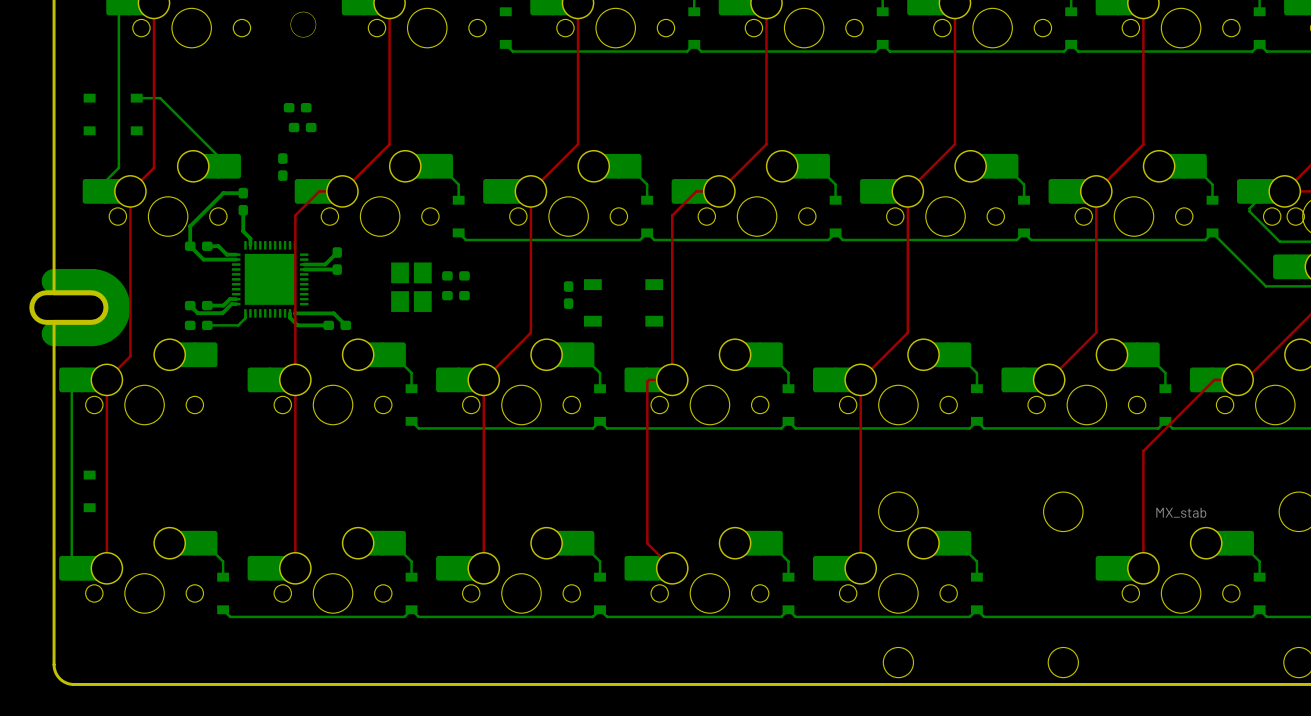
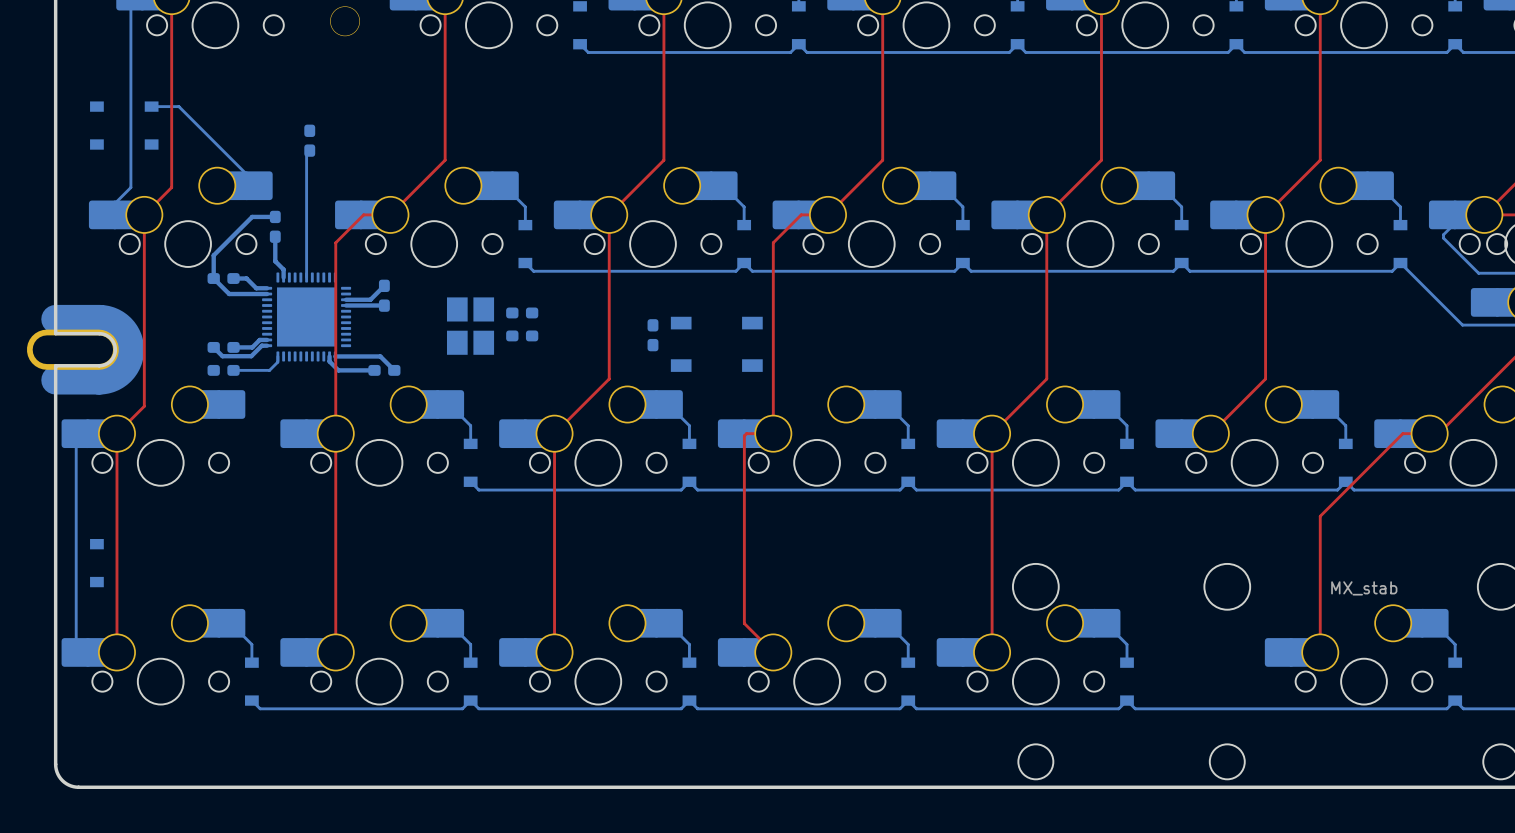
part: (297, 107) -> none
part: none -> (309, 140)
part: (302, 127) -> none
bottom track: none -> (309, 150) (306, 153) (306, 277)
part: (282, 167) -> none

